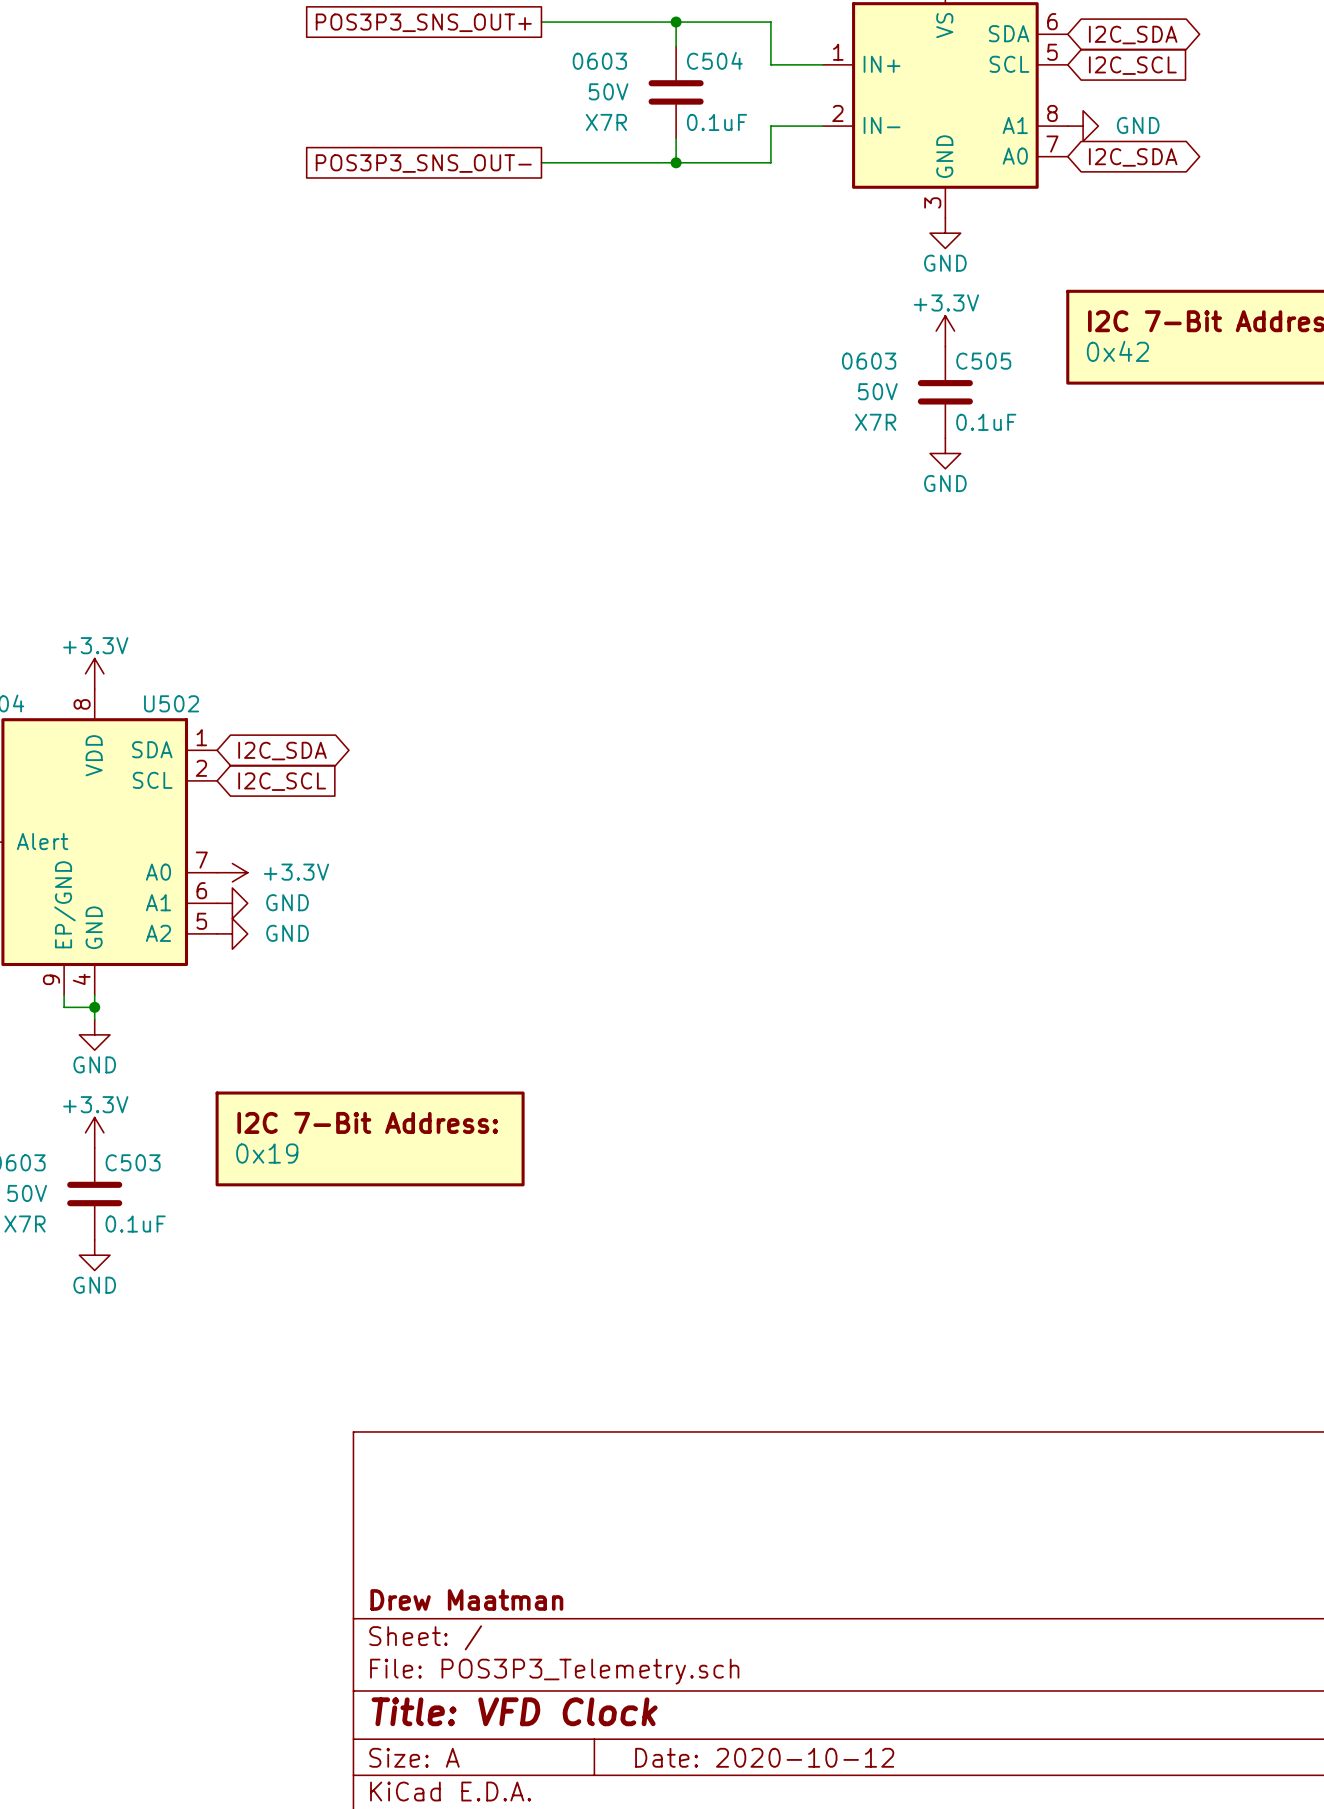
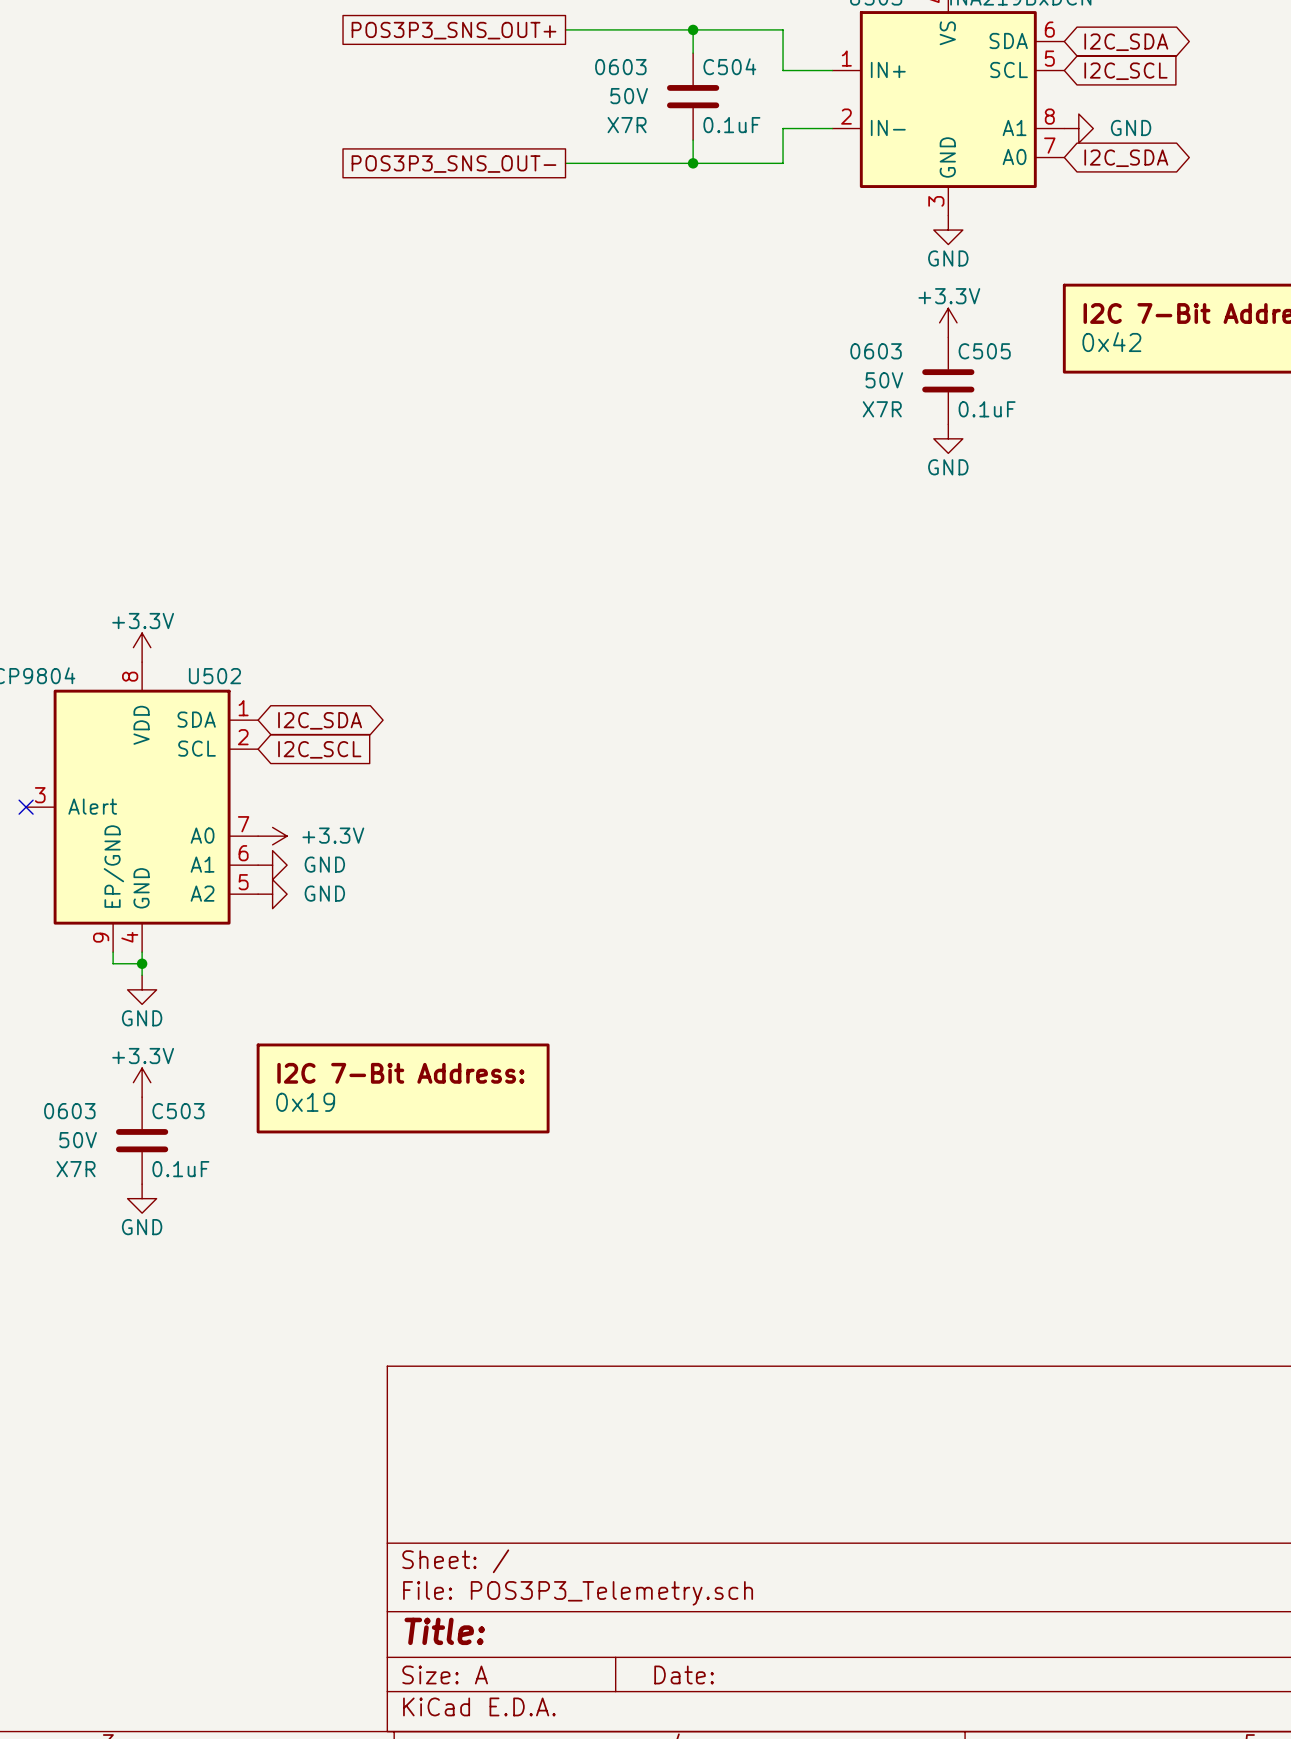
title block: Drew Maatman (466, 1599) -> none
title block: Title: VFD Clock (514, 1711) -> Title: (444, 1631)
title block: Date: 2020-10-12 (764, 1757) -> Date: (684, 1674)

